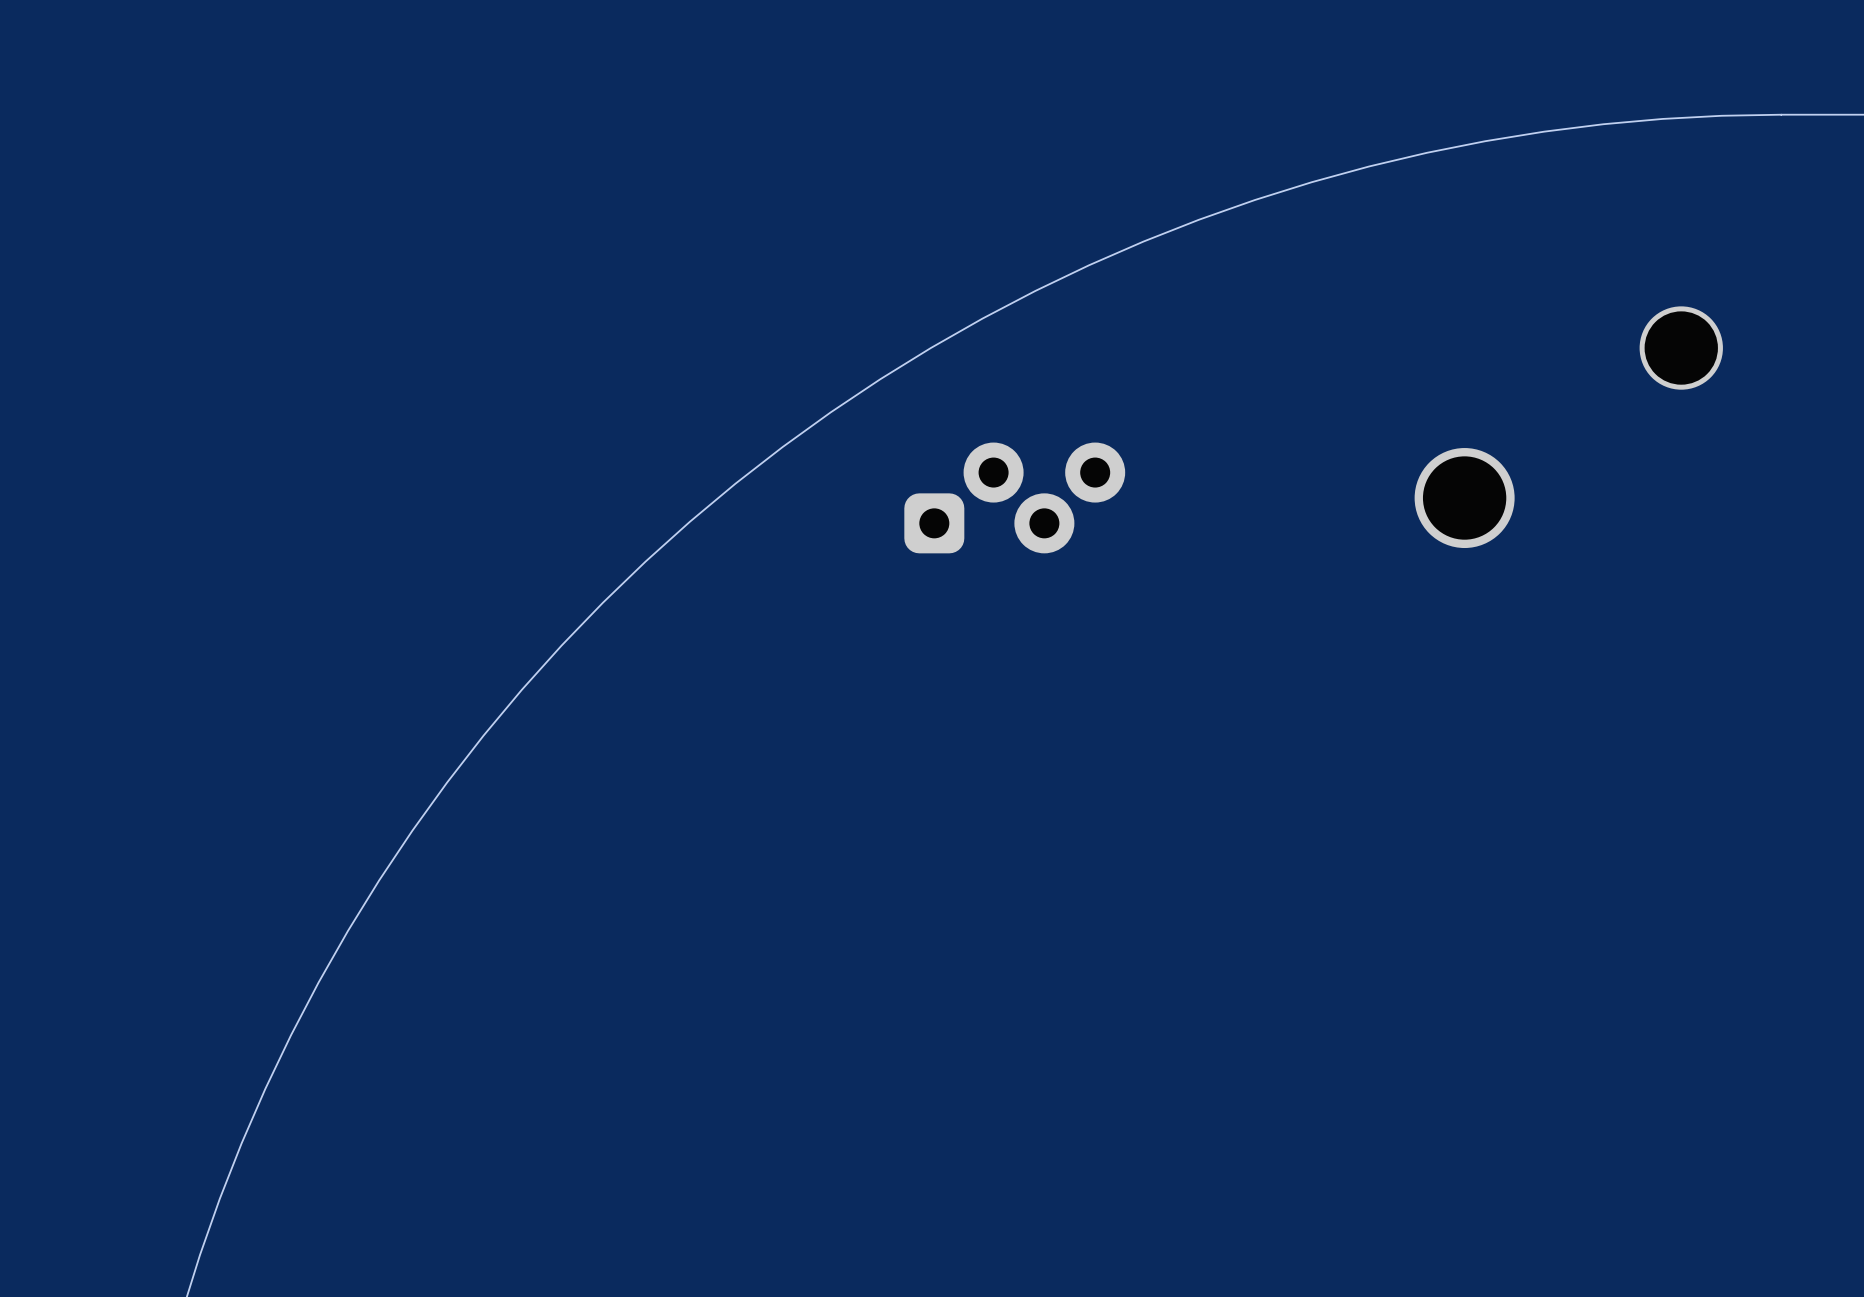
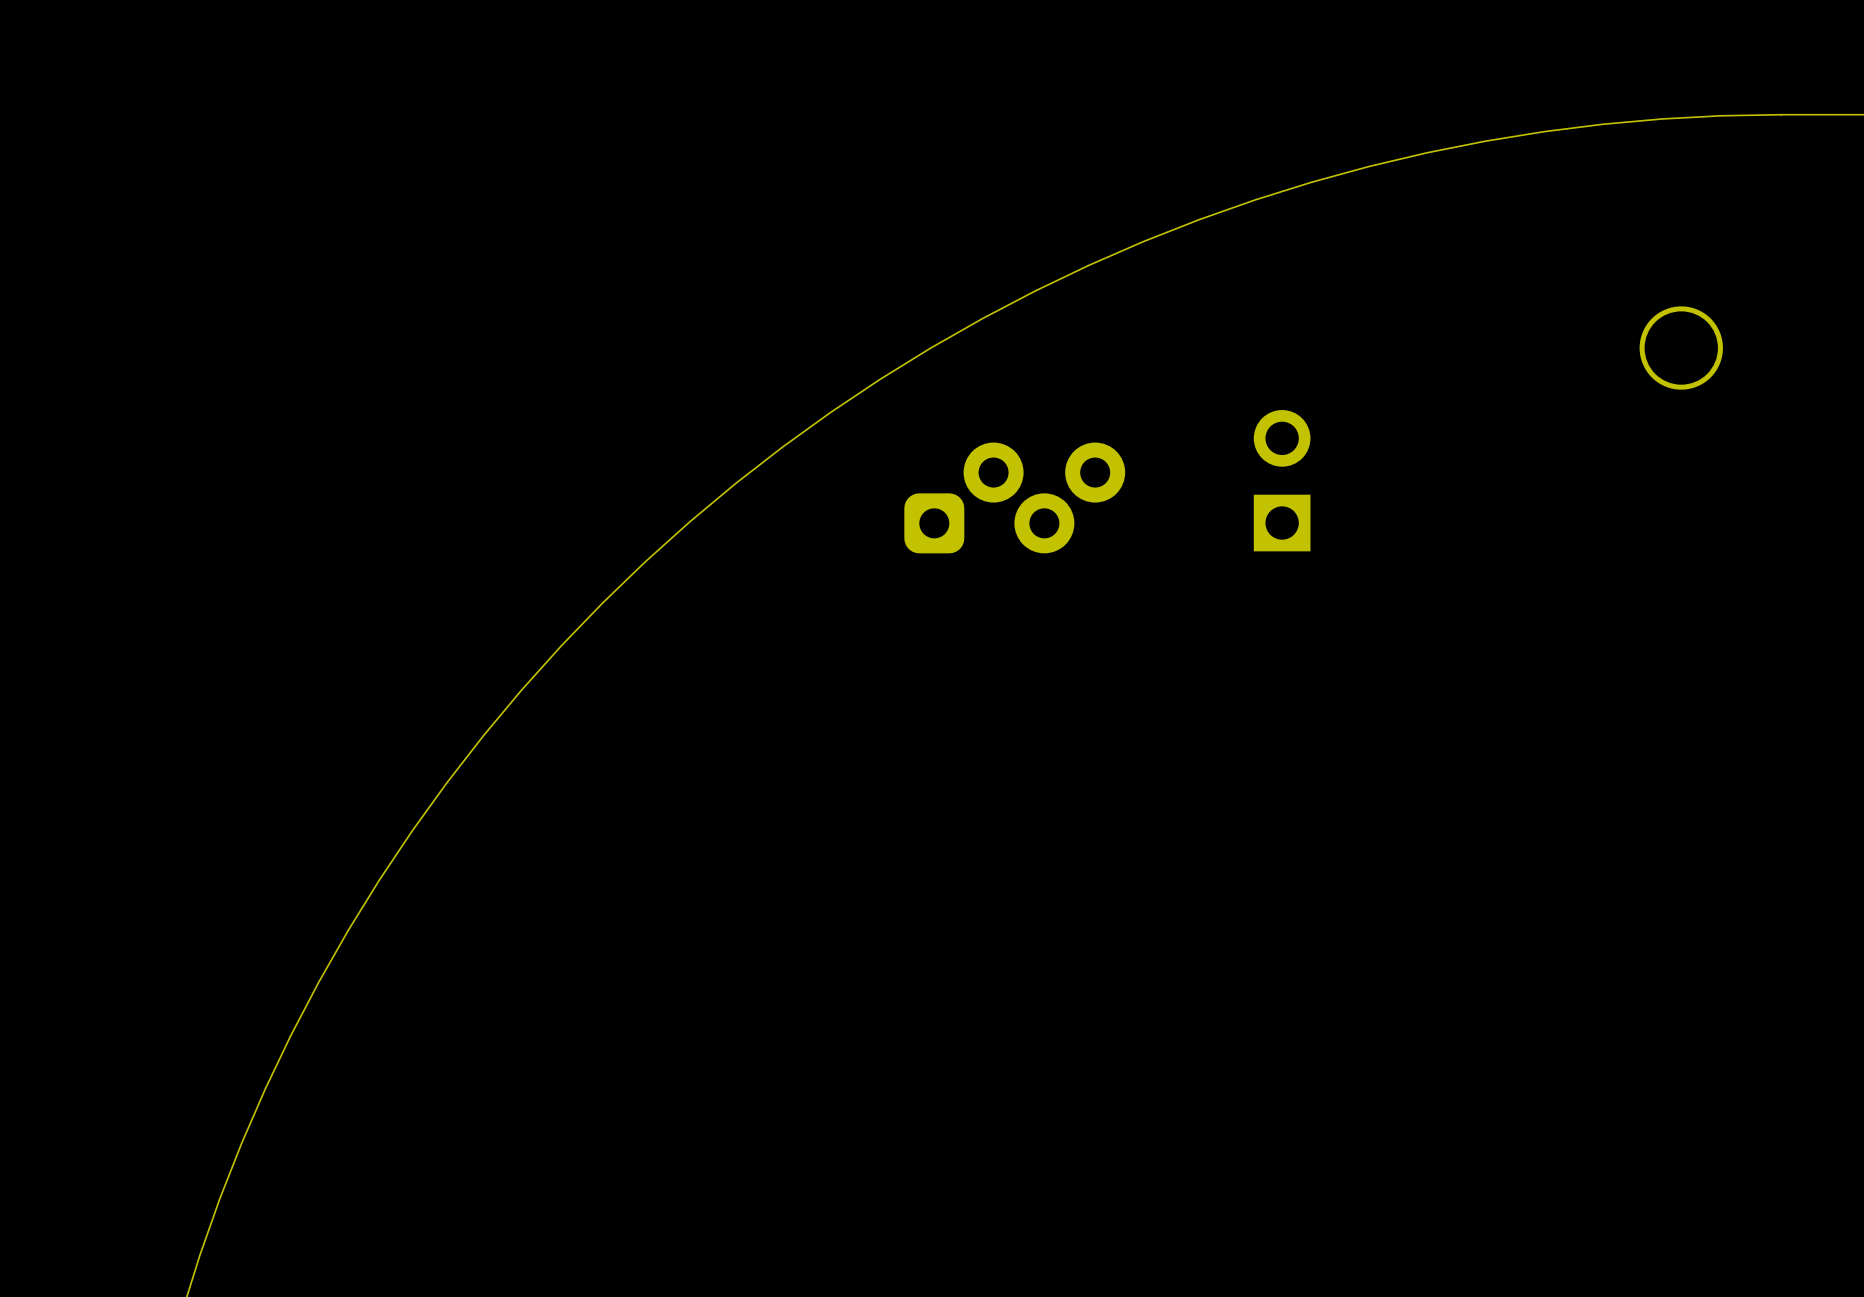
part: none -> (1282, 480)
part: (1464, 498) -> none

